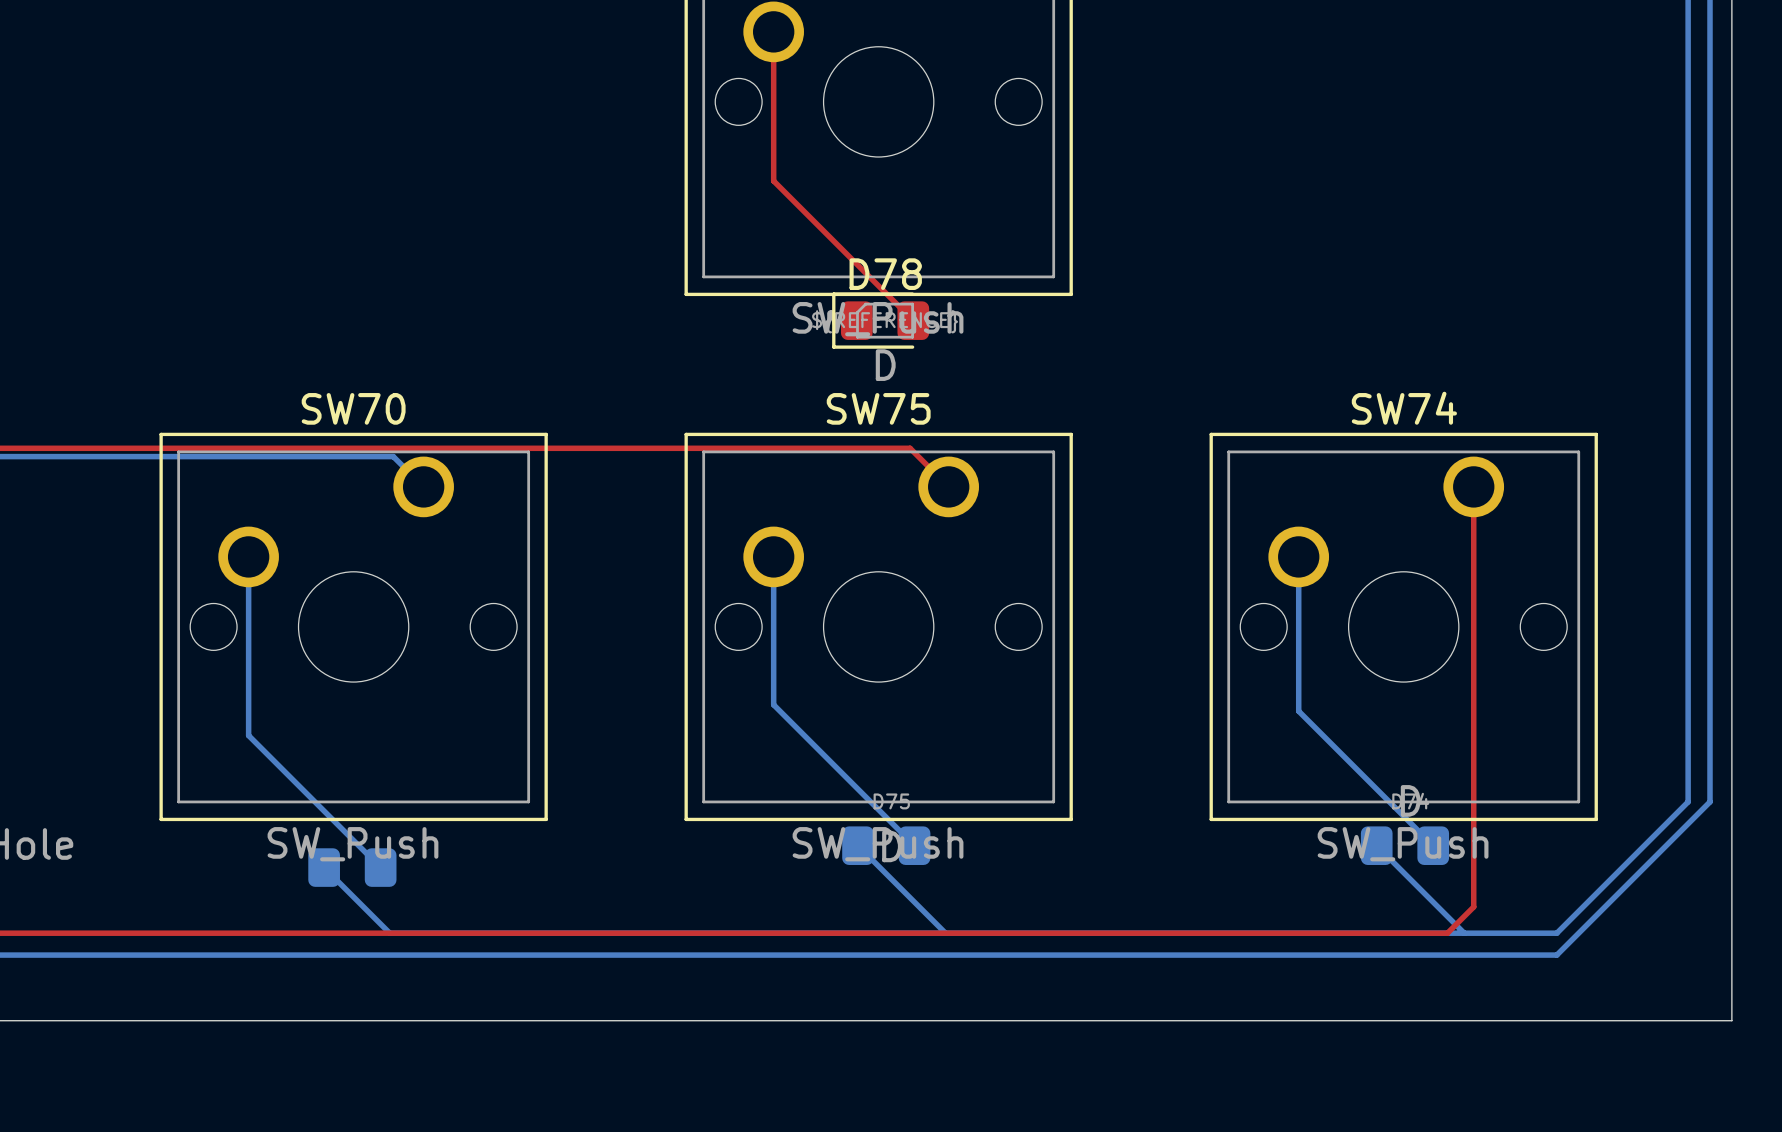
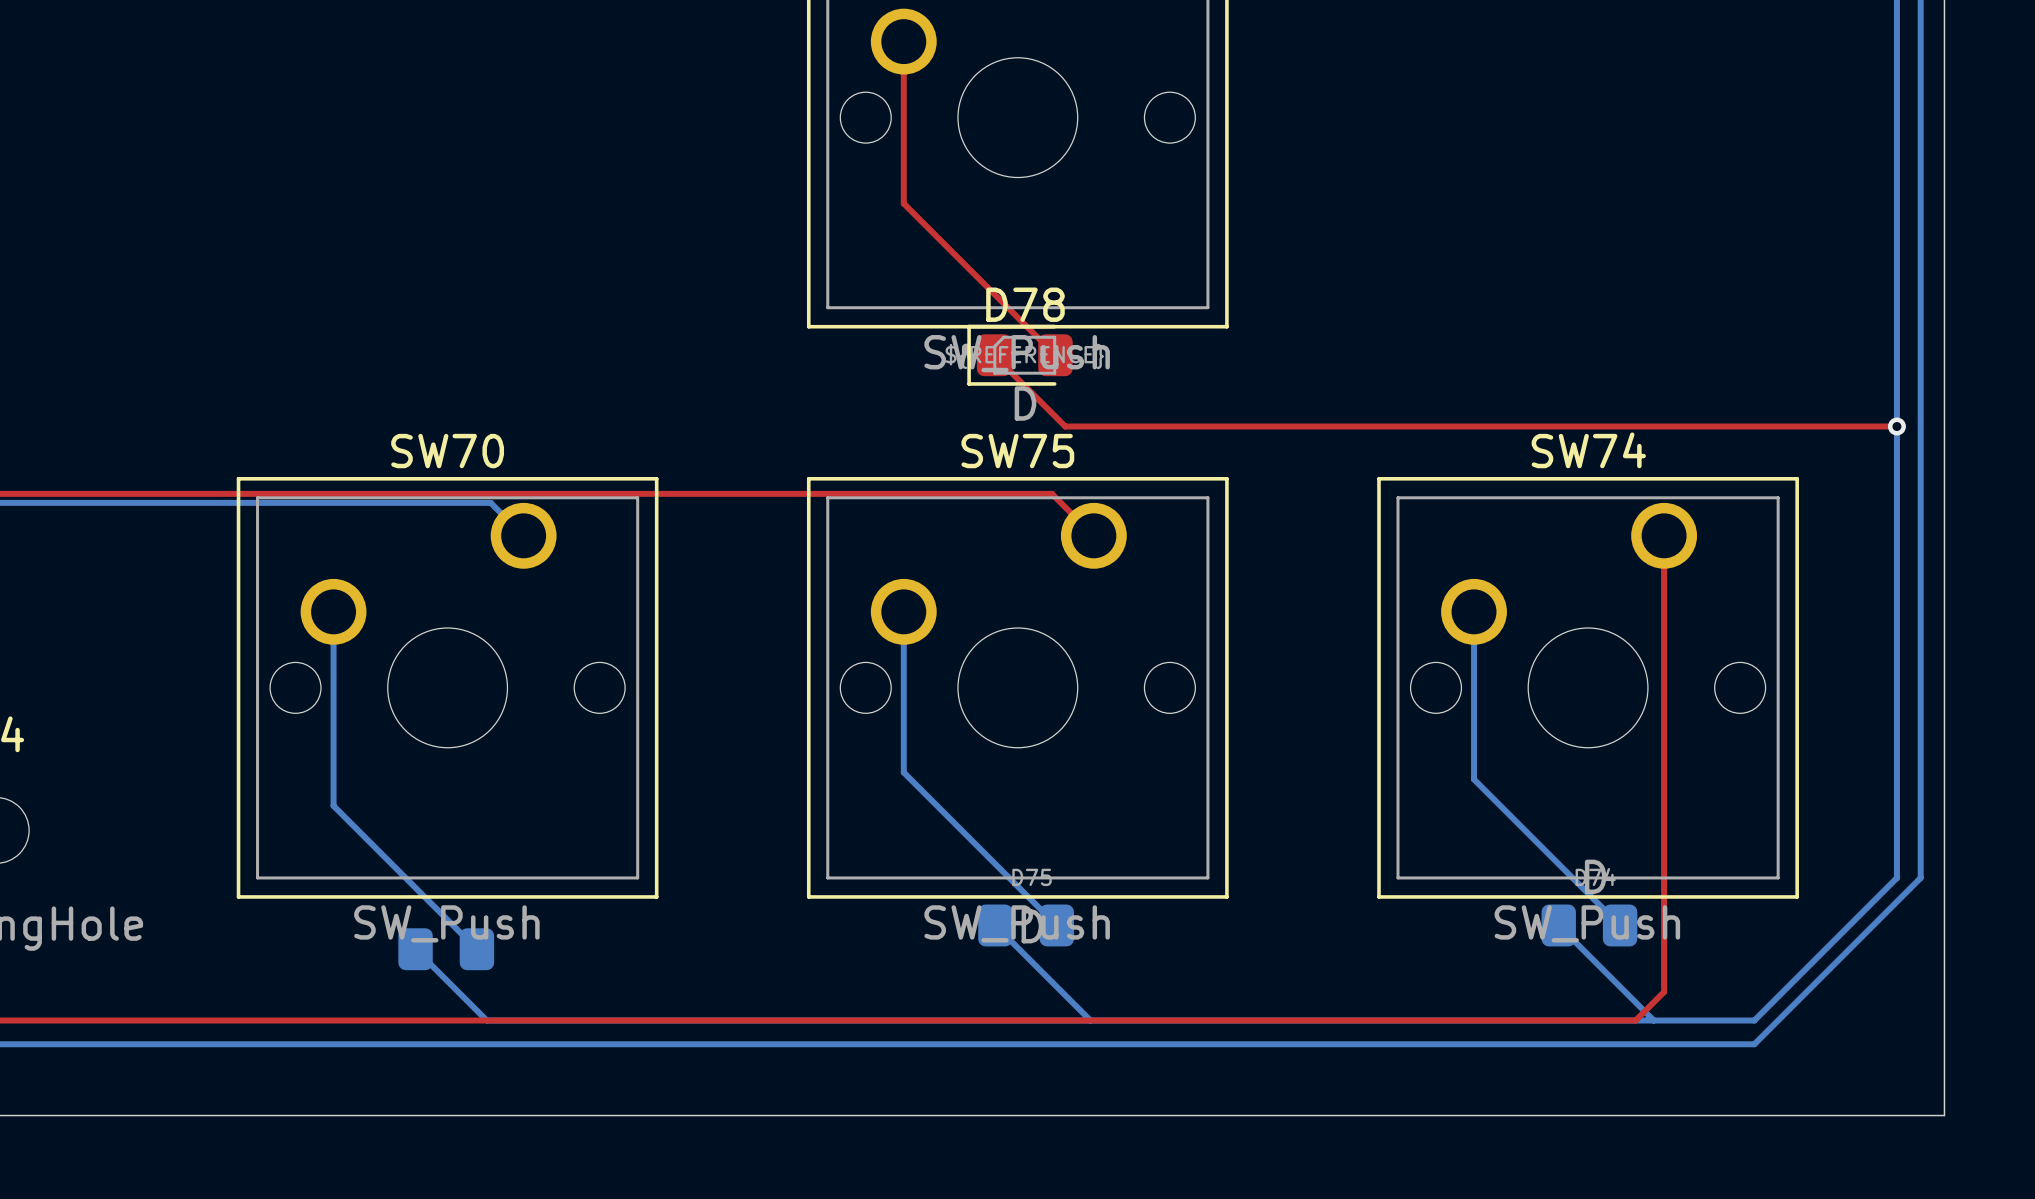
top track: none -> (994, 355) (1065, 426) (1896, 426)
via: none -> (1896, 426)

